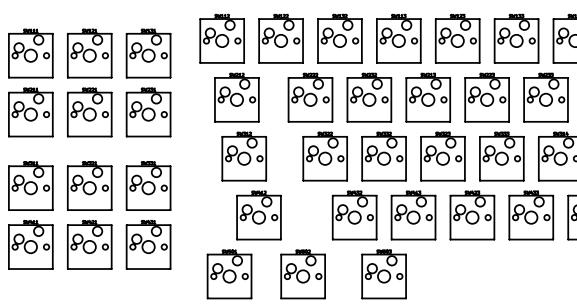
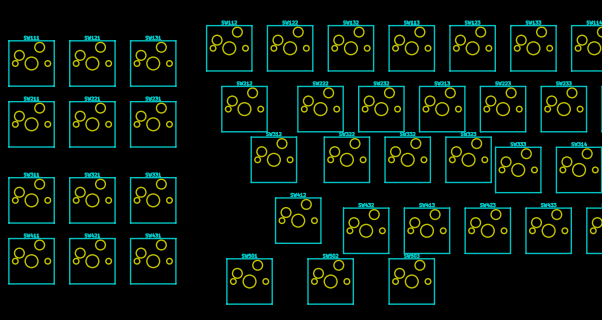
part position: (244, 158) -> (273, 159)
part position: (325, 158) -> (346, 159)
part position: (384, 158) -> (407, 159)
part position: (442, 158) -> (468, 159)
part position: (259, 217) -> (298, 220)
part position: (229, 276) -> (249, 281)
part position: (303, 276) -> (330, 281)
part position: (384, 276) -> (411, 281)

